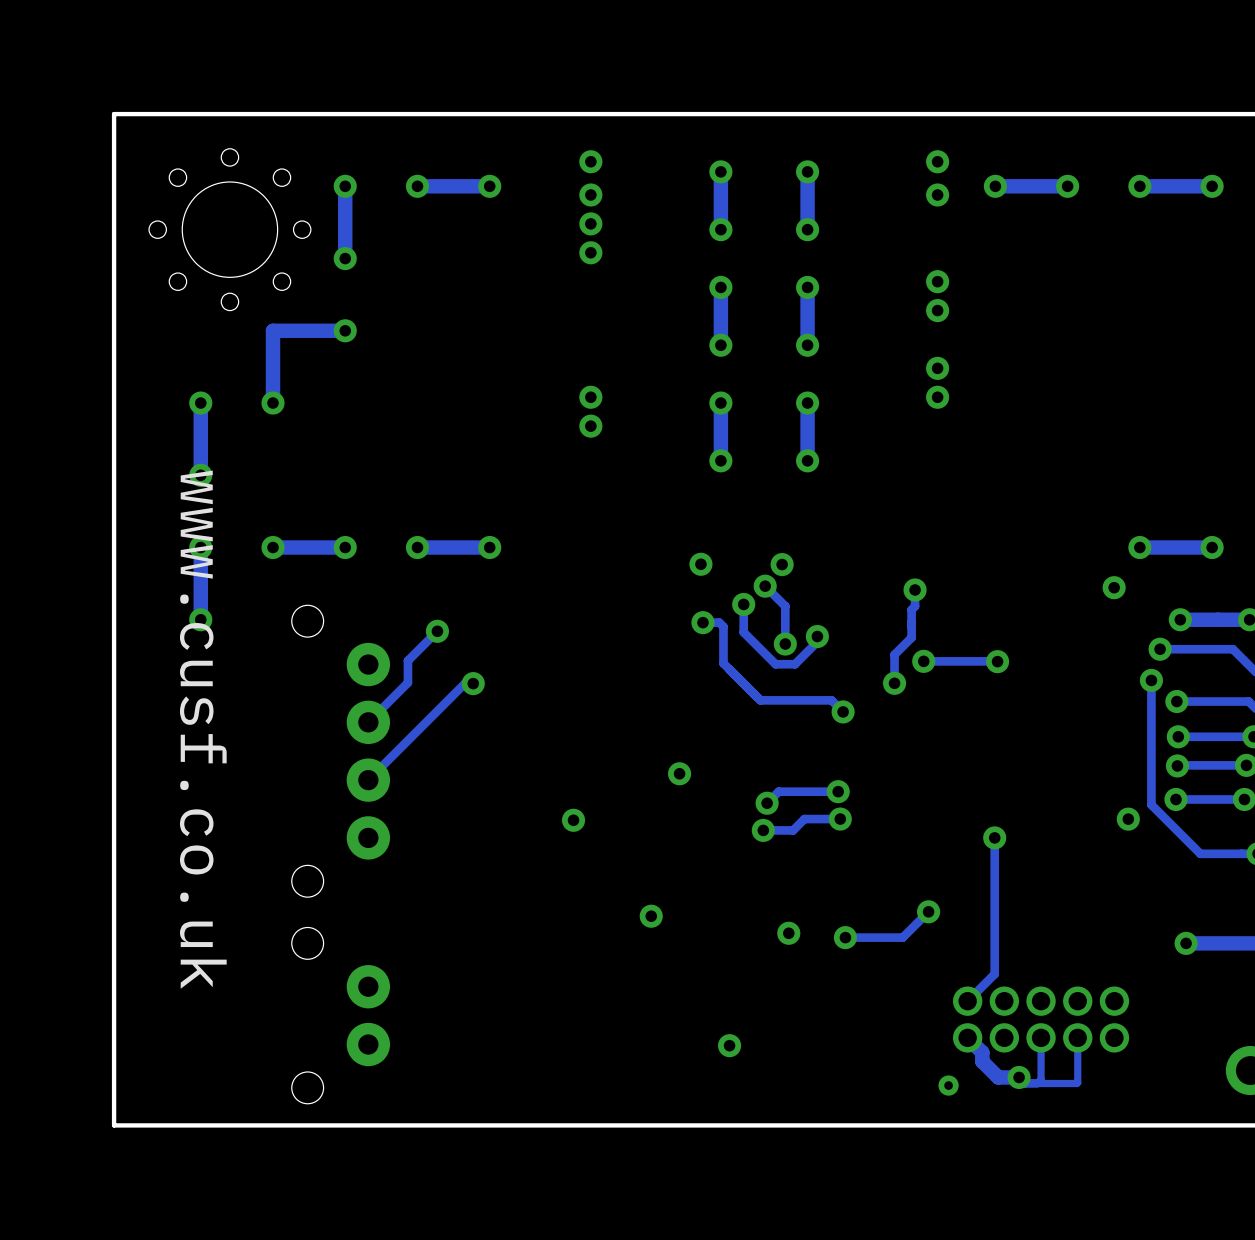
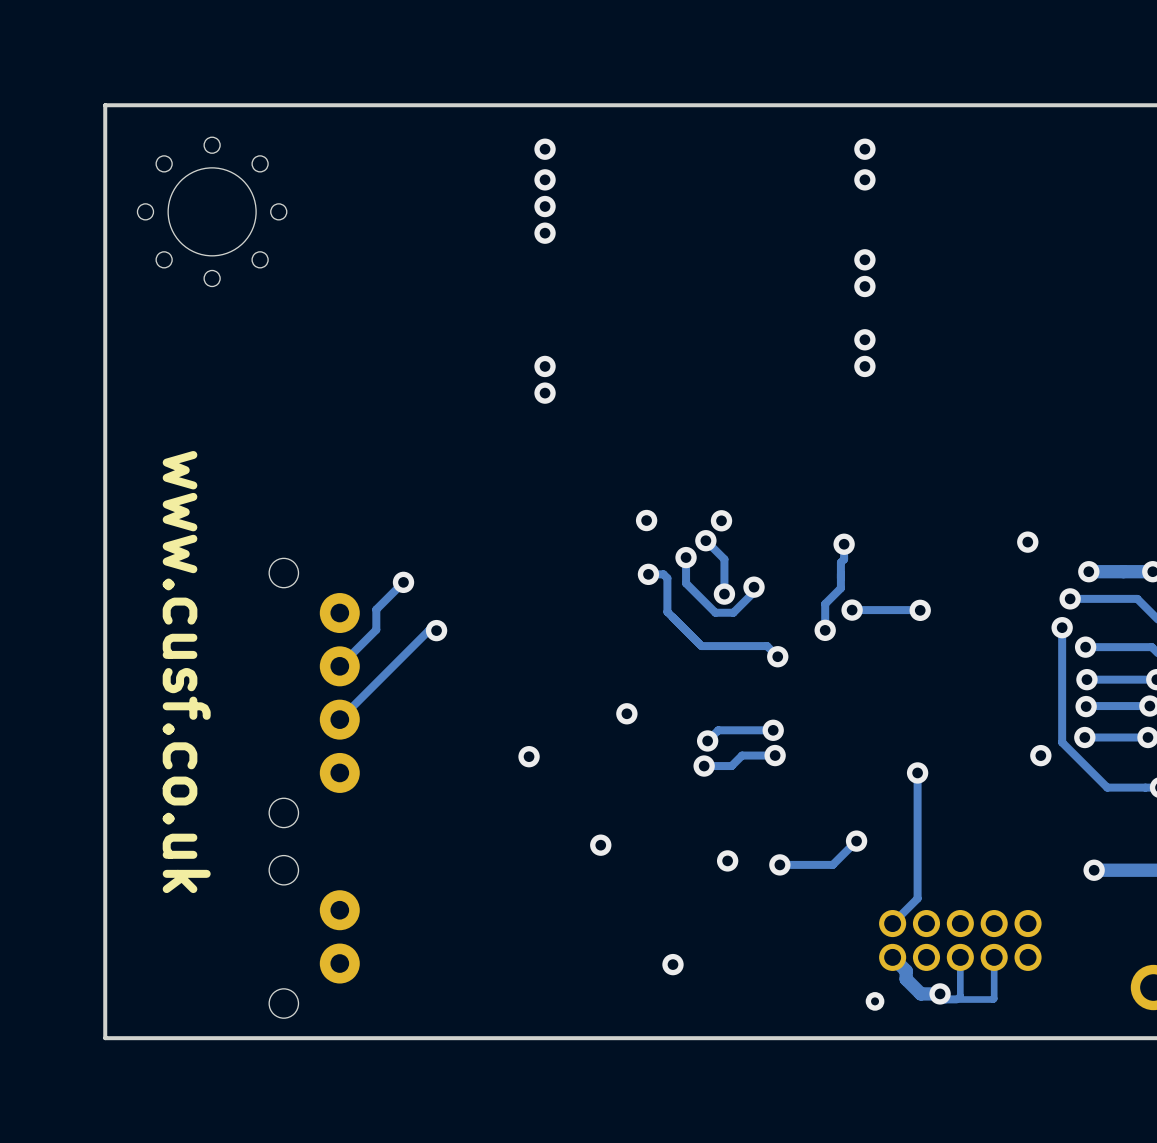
track: (720, 171) (720, 229) -> none
via: (720, 171) -> none
track: (807, 171) (807, 229) -> none
via: (807, 171) -> none
track: (345, 186) (345, 258) -> none
via: (345, 186) -> none
via: (417, 186) -> none
track: (489, 186) (417, 186) -> none
via: (489, 186) -> none
via: (995, 186) -> none
track: (1067, 186) (995, 186) -> none
via: (1067, 186) -> none
via: (1139, 186) -> none
track: (1212, 186) (1139, 186) -> none
via: (1212, 186) -> none
via: (720, 229) -> none
via: (807, 229) -> none
via: (345, 258) -> none
track: (720, 287) (720, 345) -> none
via: (720, 287) -> none
track: (807, 287) (807, 345) -> none
via: (807, 287) -> none
track: (345, 330) (273, 330) (273, 403) -> none
via: (345, 330) -> none
via: (720, 345) -> none
via: (807, 345) -> none
track: (200, 403) (200, 475) -> none
via: (200, 403) -> none
via: (273, 403) -> none
track: (720, 403) (720, 460) -> none
via: (720, 403) -> none
track: (807, 403) (807, 460) -> none
via: (807, 403) -> none
via: (720, 460) -> none
via: (807, 460) -> none
via: (200, 475) -> none
track: (200, 547) (200, 619) -> none
via: (200, 547) -> none
via: (273, 547) -> none
track: (345, 547) (273, 547) -> none
via: (345, 547) -> none
via: (417, 547) -> none
track: (489, 547) (417, 547) -> none
via: (489, 547) -> none
via: (1139, 547) -> none
track: (1212, 547) (1139, 547) -> none
via: (1212, 547) -> none
via: (200, 619) -> none

